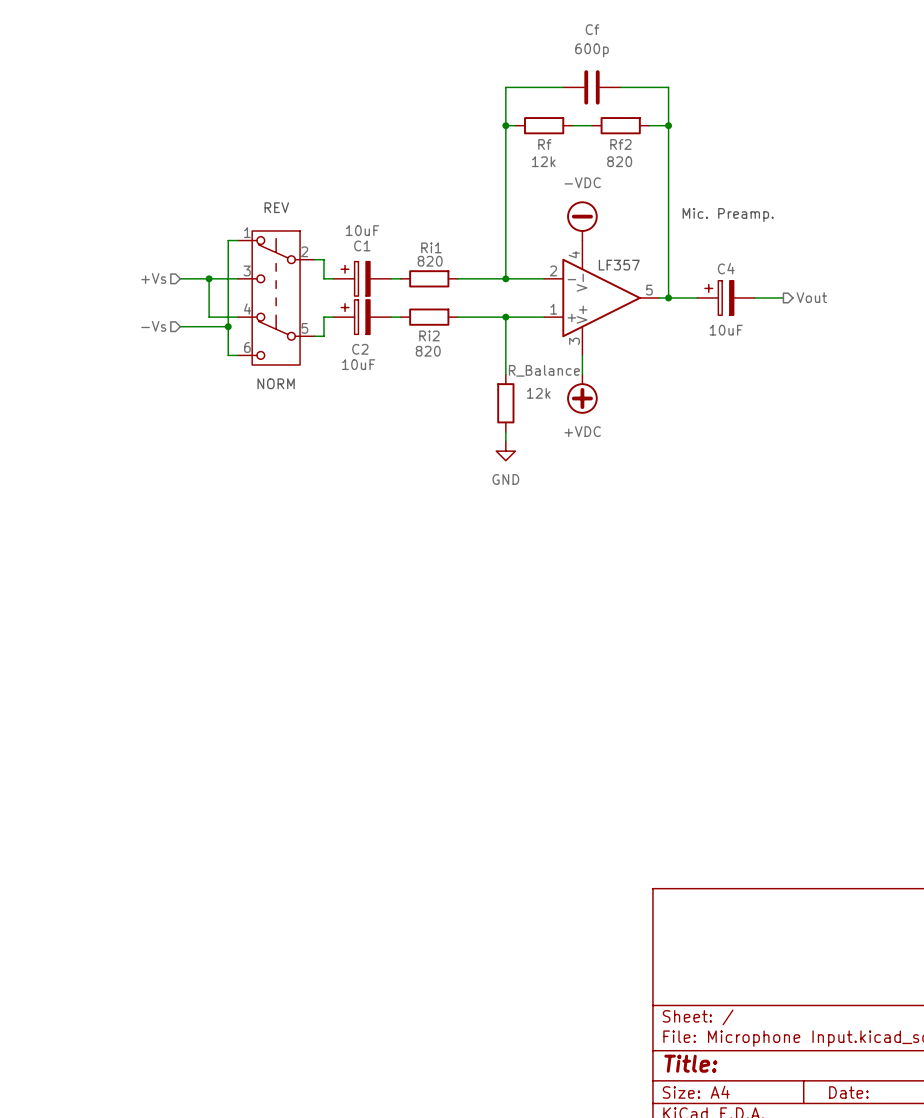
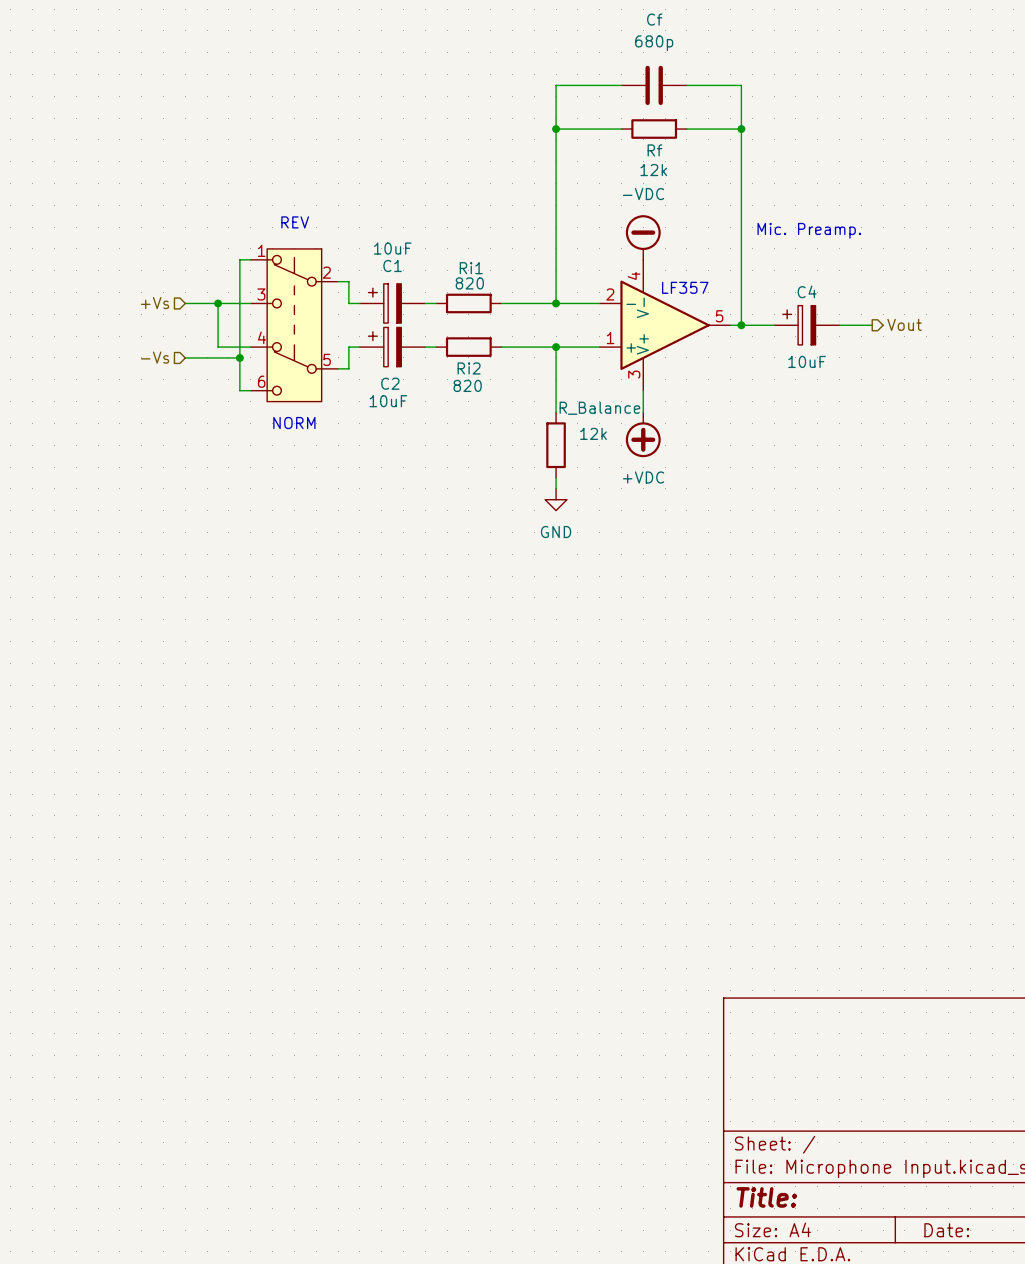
Cf value: 600p (591, 50) -> 680p (654, 43)
wire: none -> (566, 129) (621, 129)
Rf position: (544, 125) -> (654, 129)
wire: (572, 125) (591, 125) -> none
wire: none -> (686, 129) (719, 129)
Rf2: 820 (620, 125) -> none

